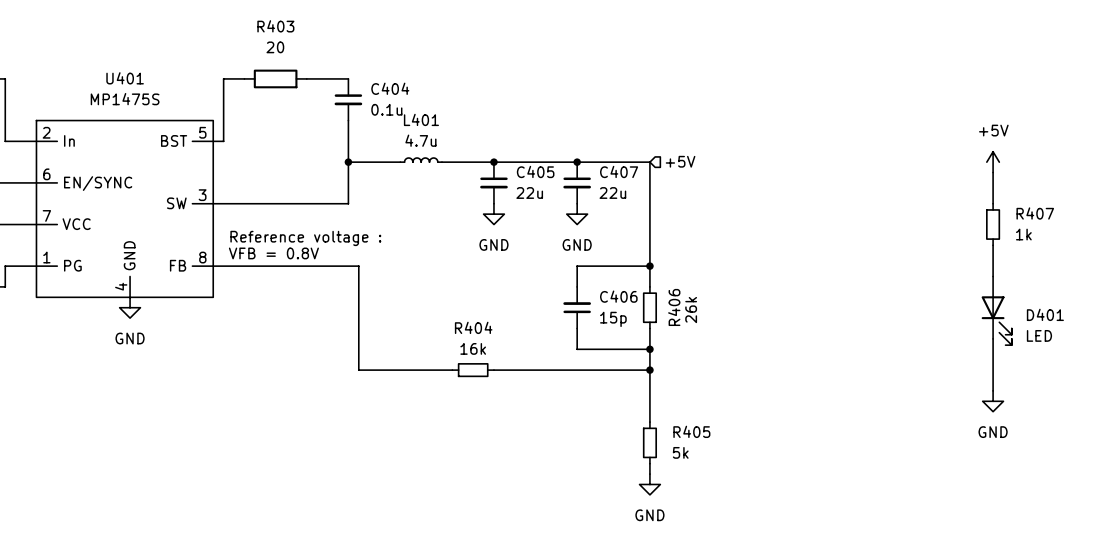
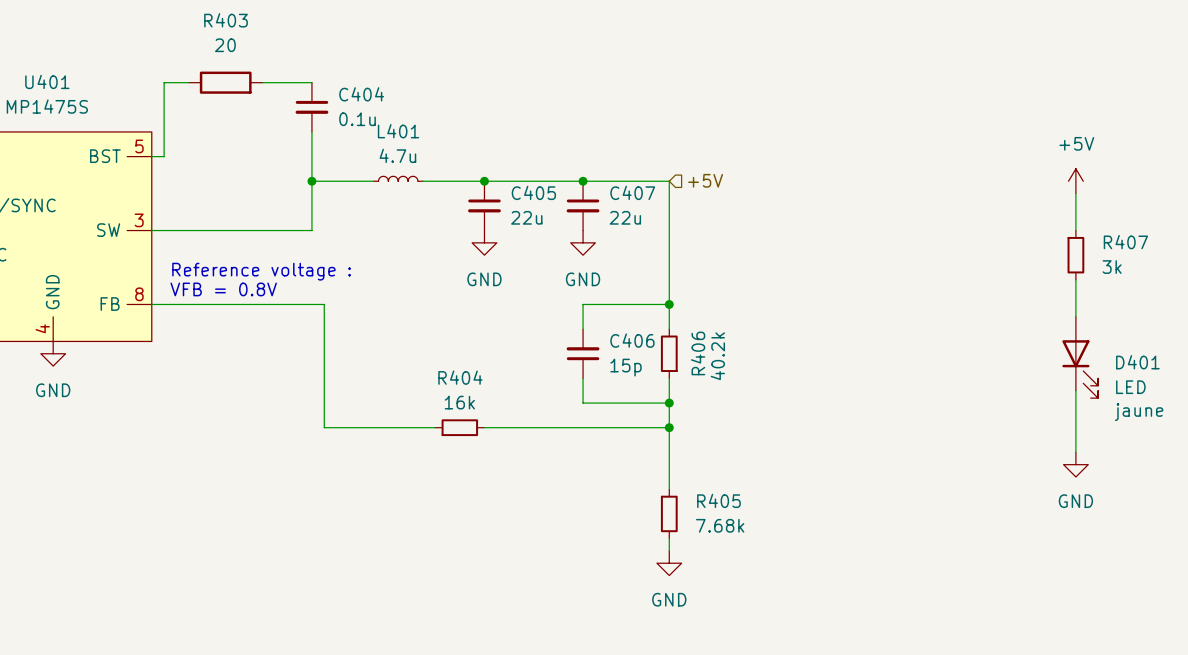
R407 value: 1k (1023, 234) -> 3k (1112, 267)
R406 value: 26k (691, 310) -> 40.2k (717, 356)
D401 text: none -> jaune (1139, 412)
R405 value: 5k (680, 452) -> 7.68k (720, 525)

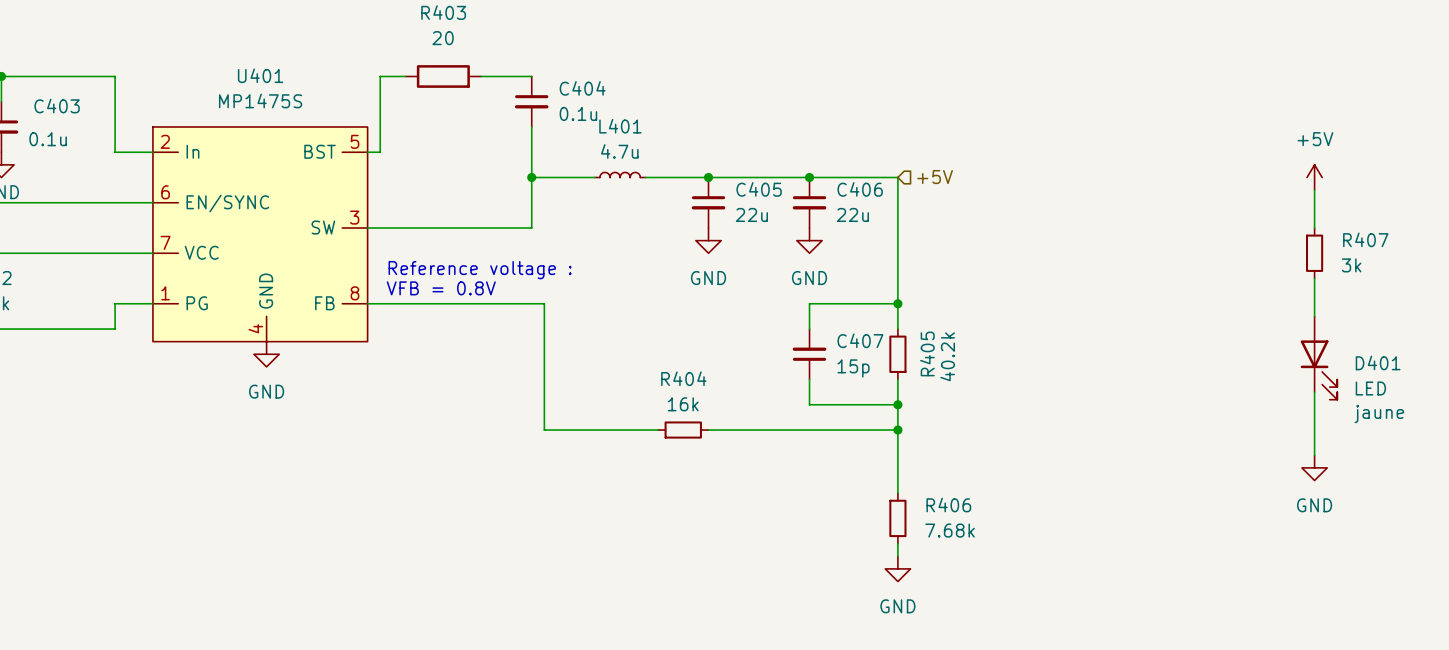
C407 name: C407 (632, 192) -> C406 (860, 189)
C406 name: C406 (632, 340) -> C407 (860, 340)
R406 name: R406 (698, 353) -> R405 (927, 353)
R405 name: R405 (718, 500) -> R406 (948, 505)

